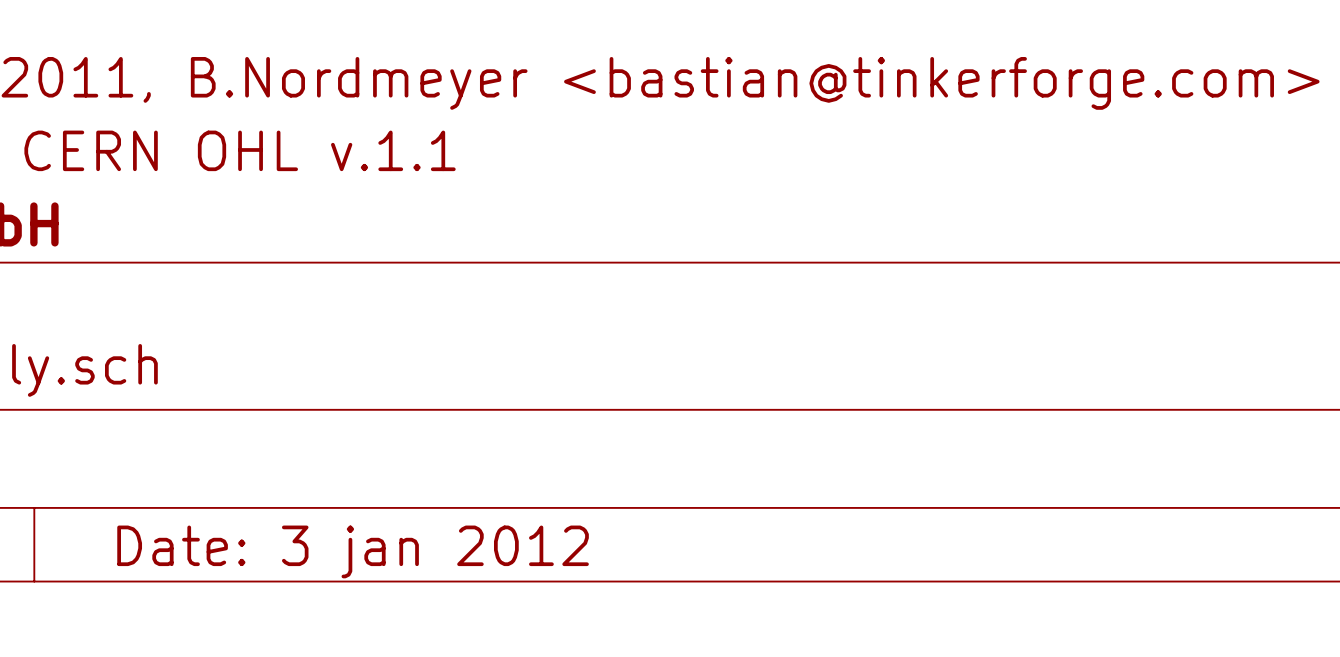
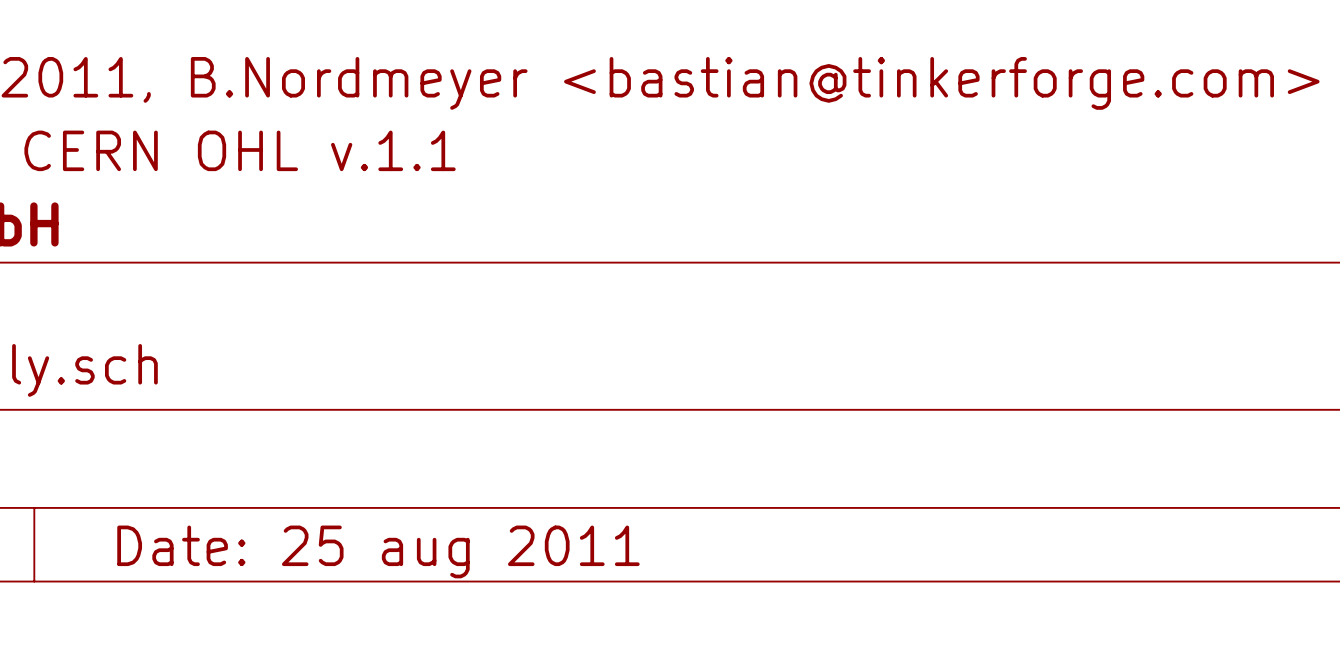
title block: Date: 3 jan 2012 (353, 551) -> Date: 25 aug 2011 (378, 551)

